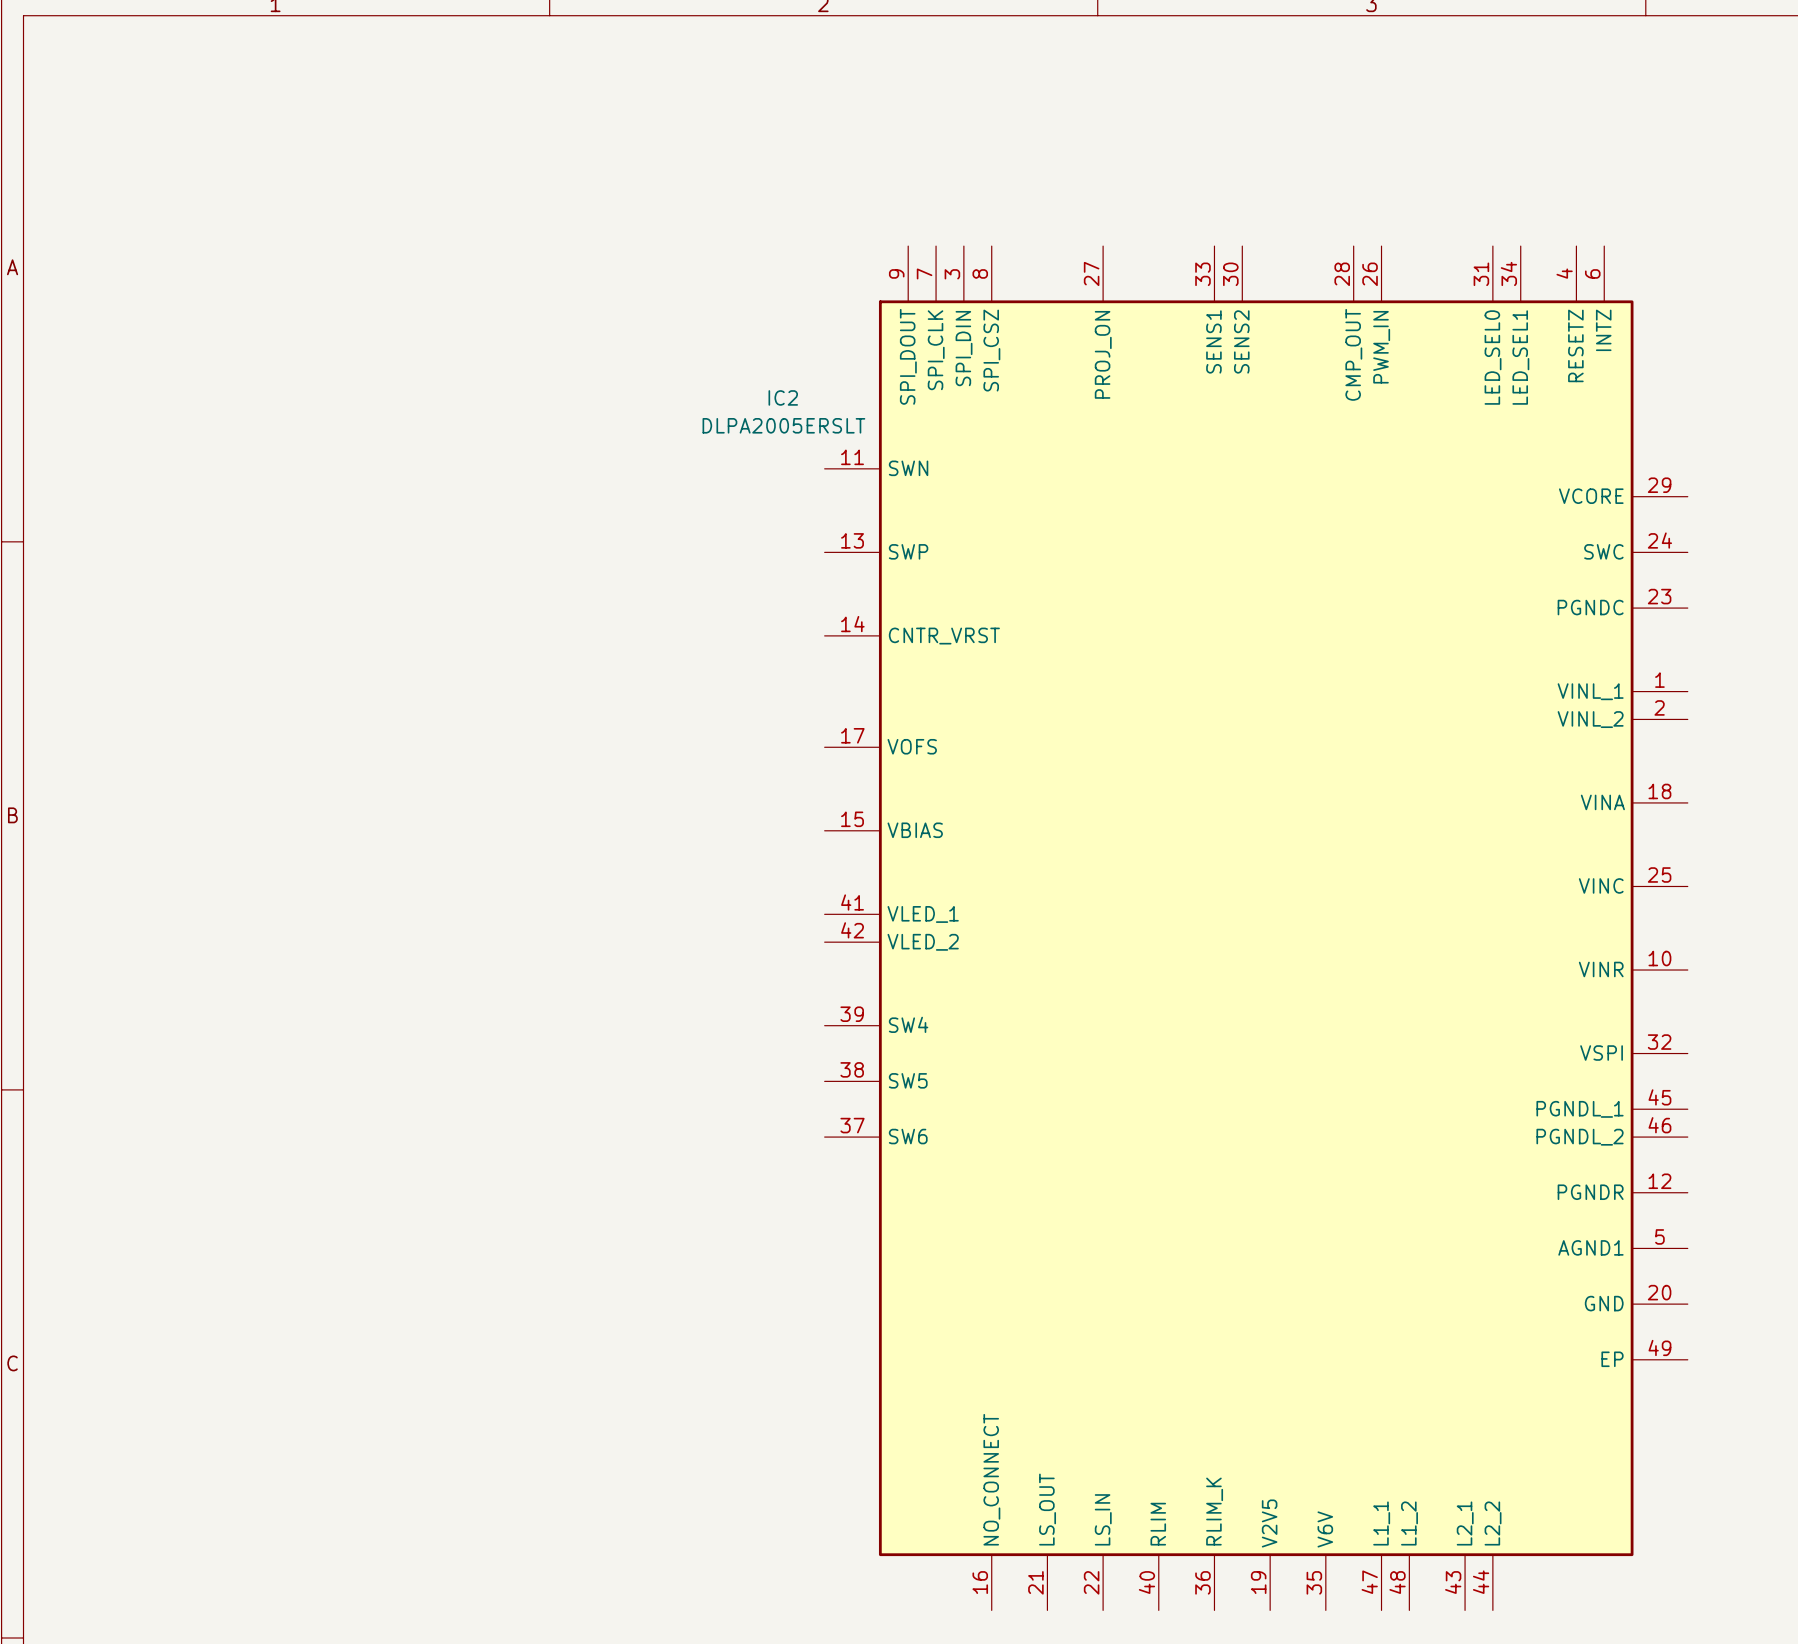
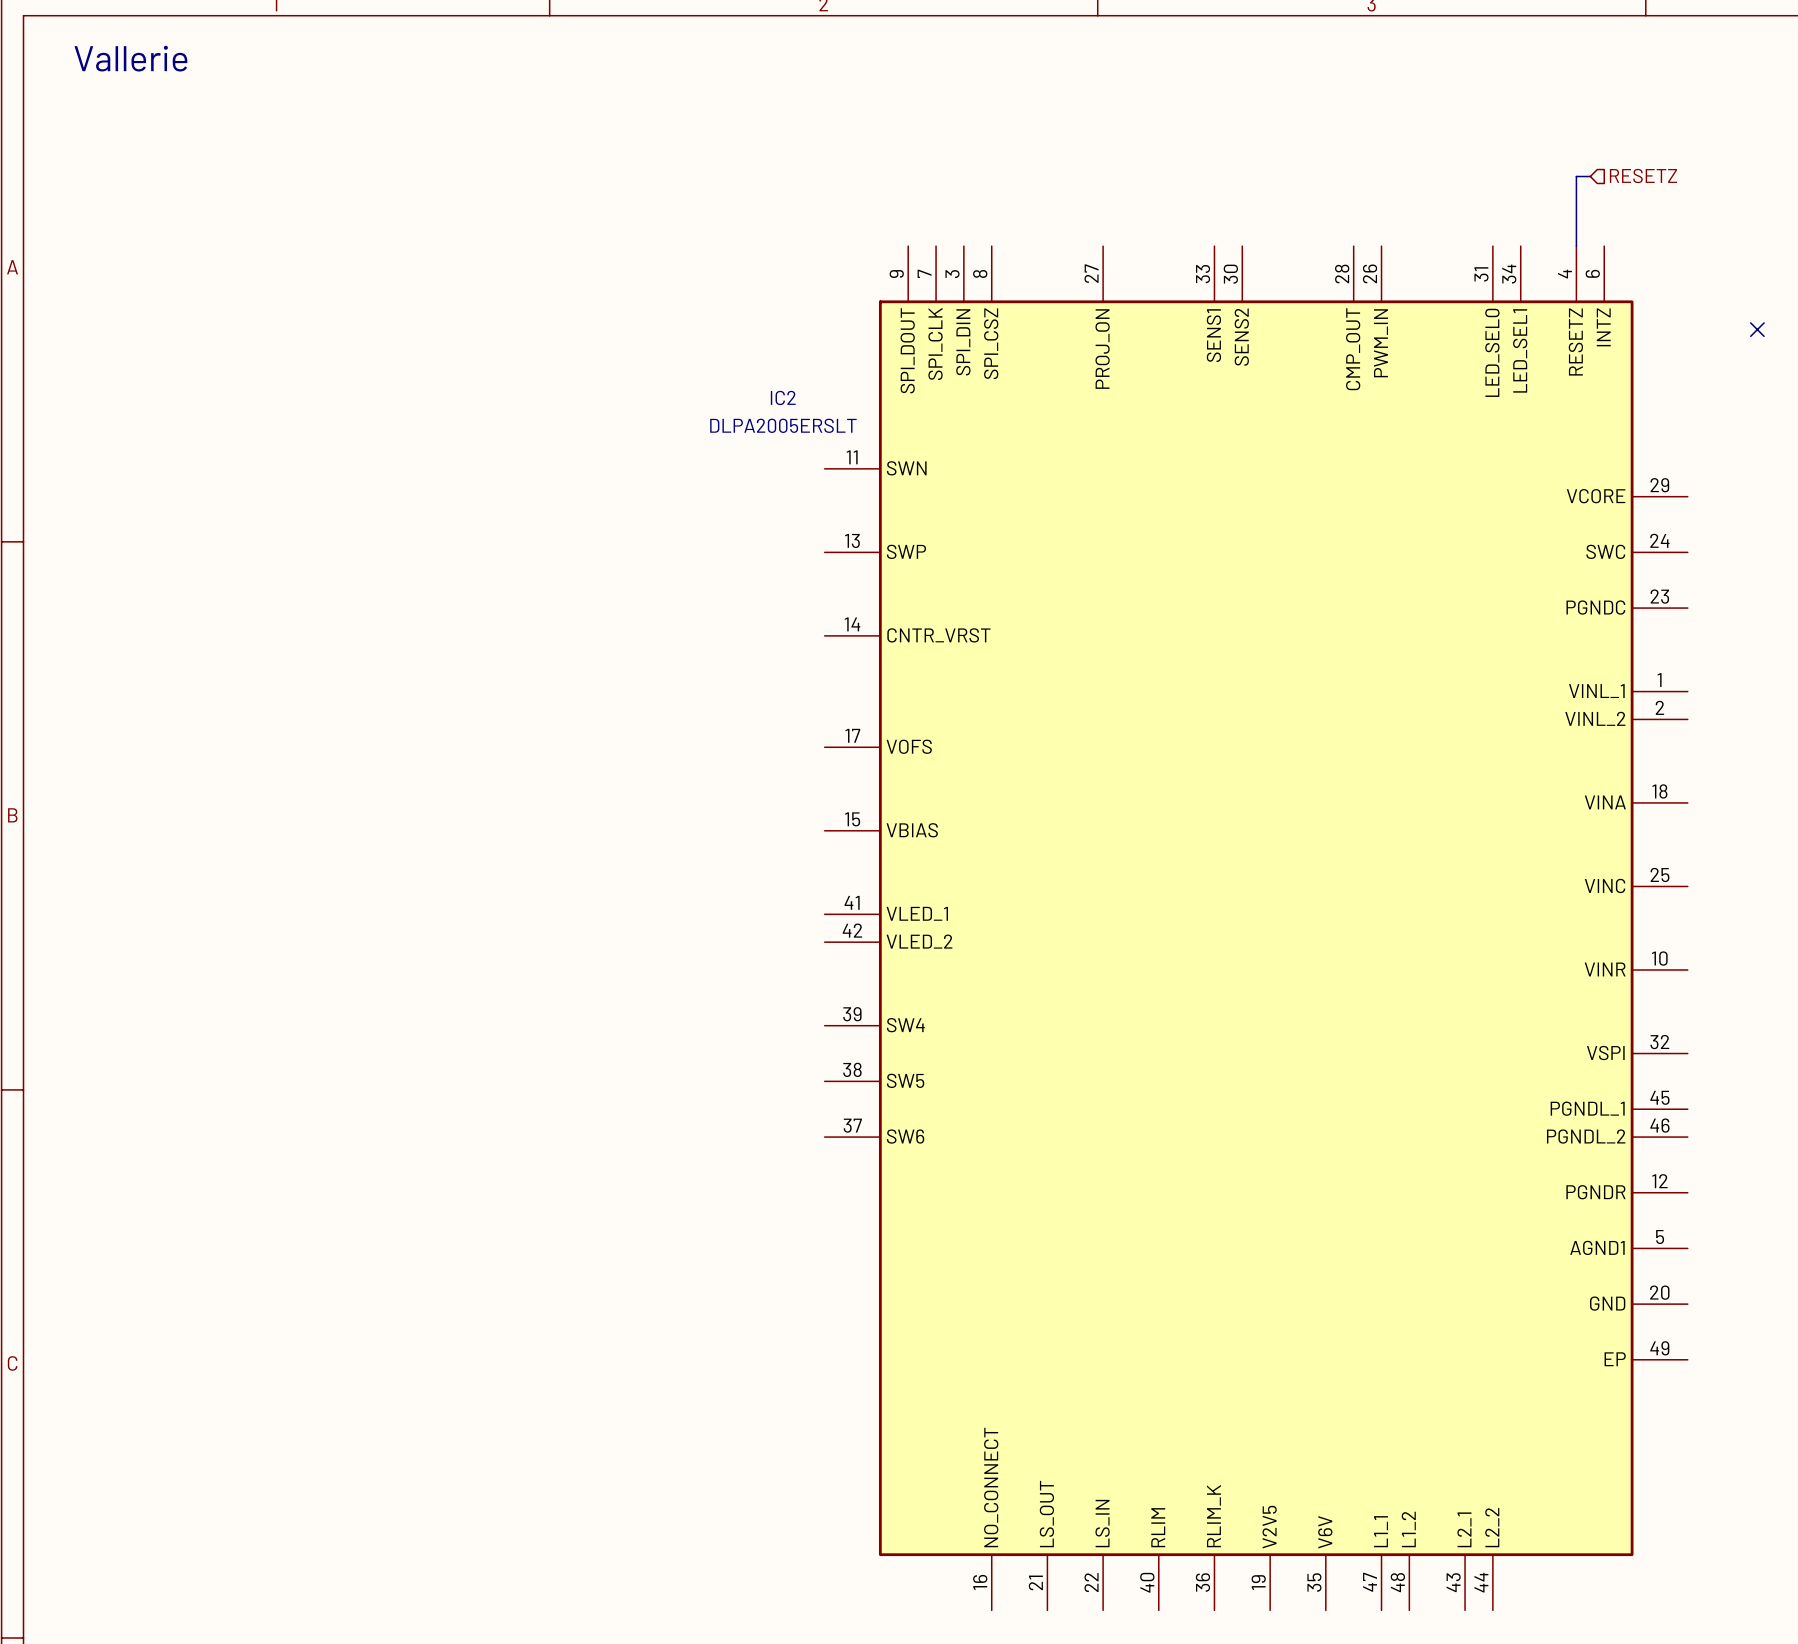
text: none -> Vallerie (130, 58)
hierarchical label: none -> RESETZ (1643, 175)
wire: none -> (1590, 176) (1576, 176) (1576, 246)
no-connect mark: none -> (1757, 329)

